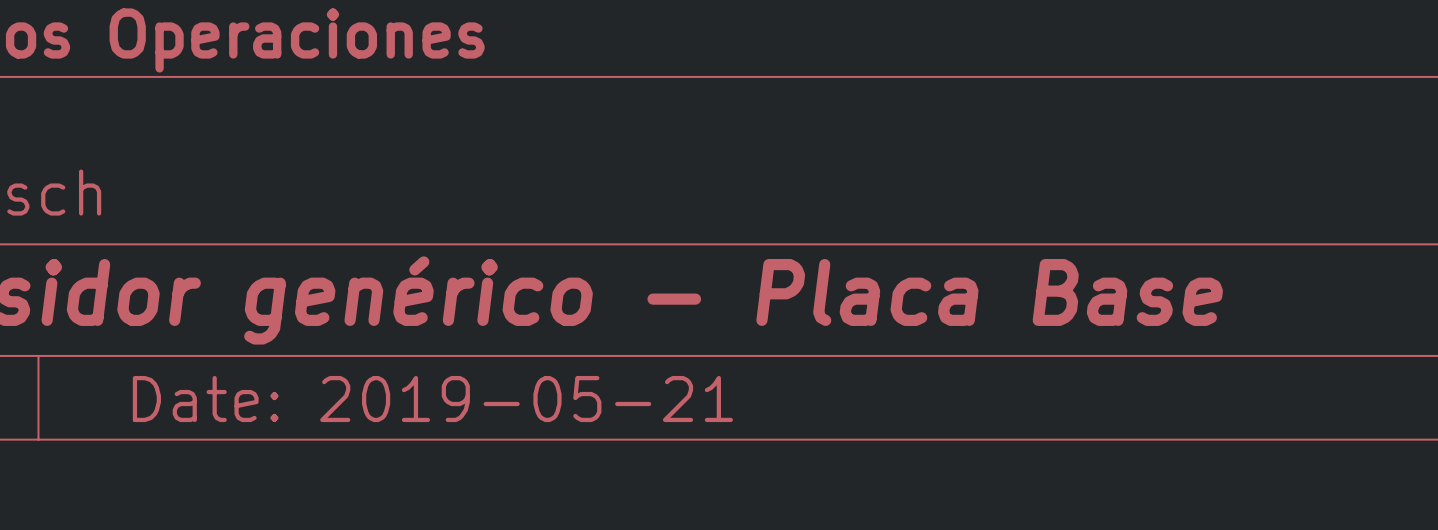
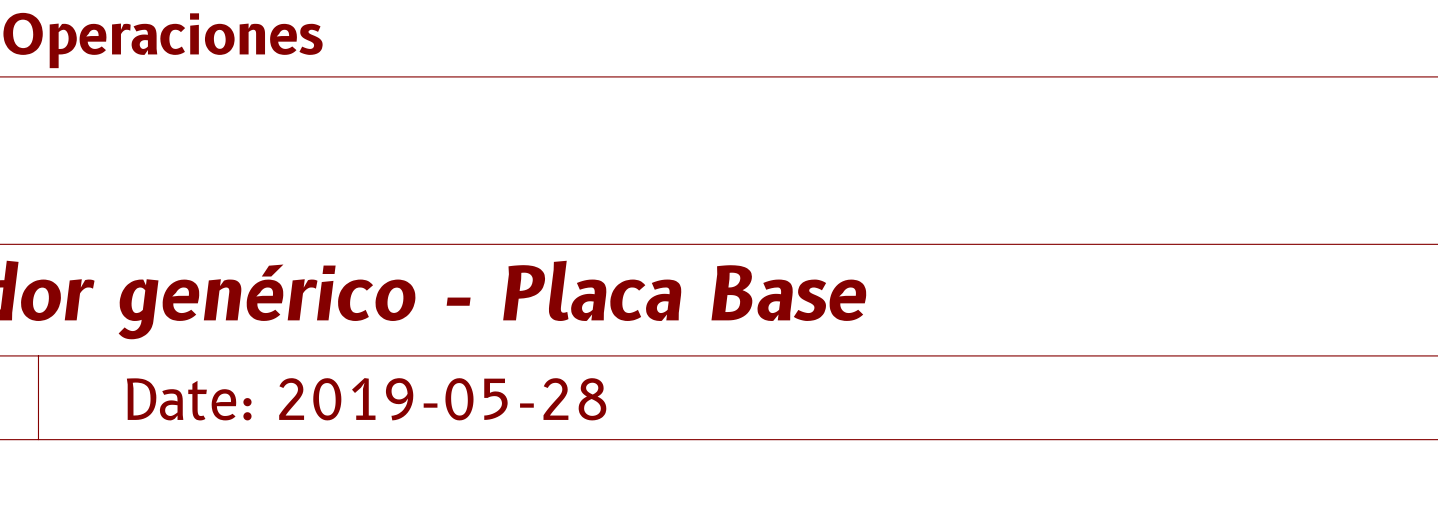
title block: Date: 2019-05-21 (432, 399) -> Date: 2019-05-28 (366, 399)

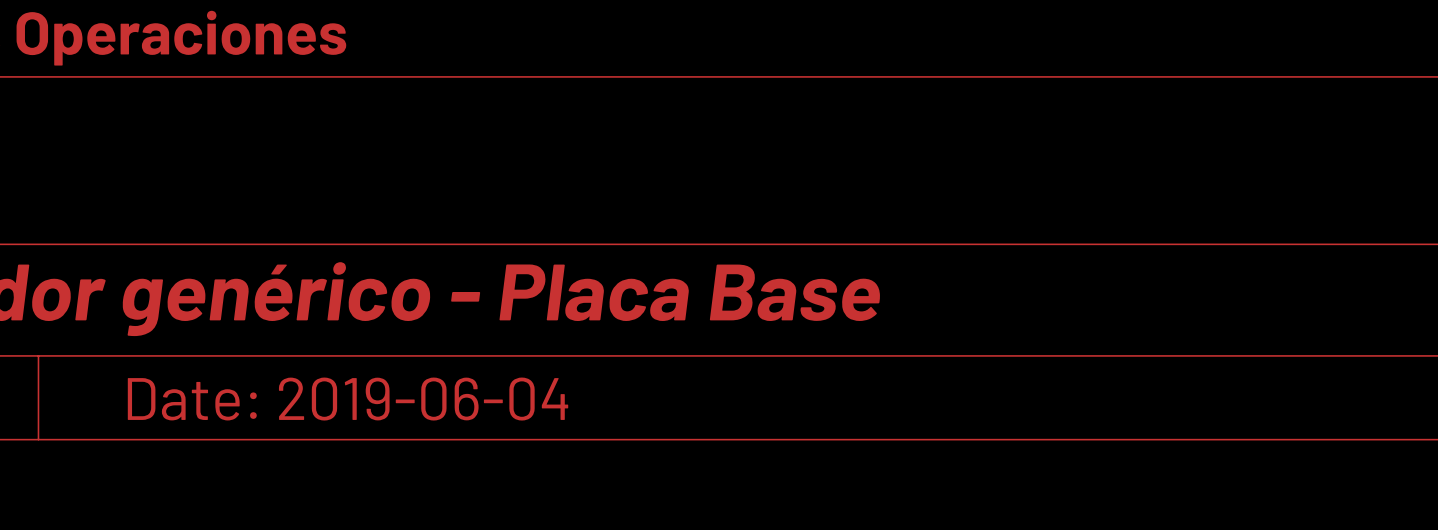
title block: Date: 2019-05-28 (366, 399) -> Date: 2019-06-04 (348, 399)

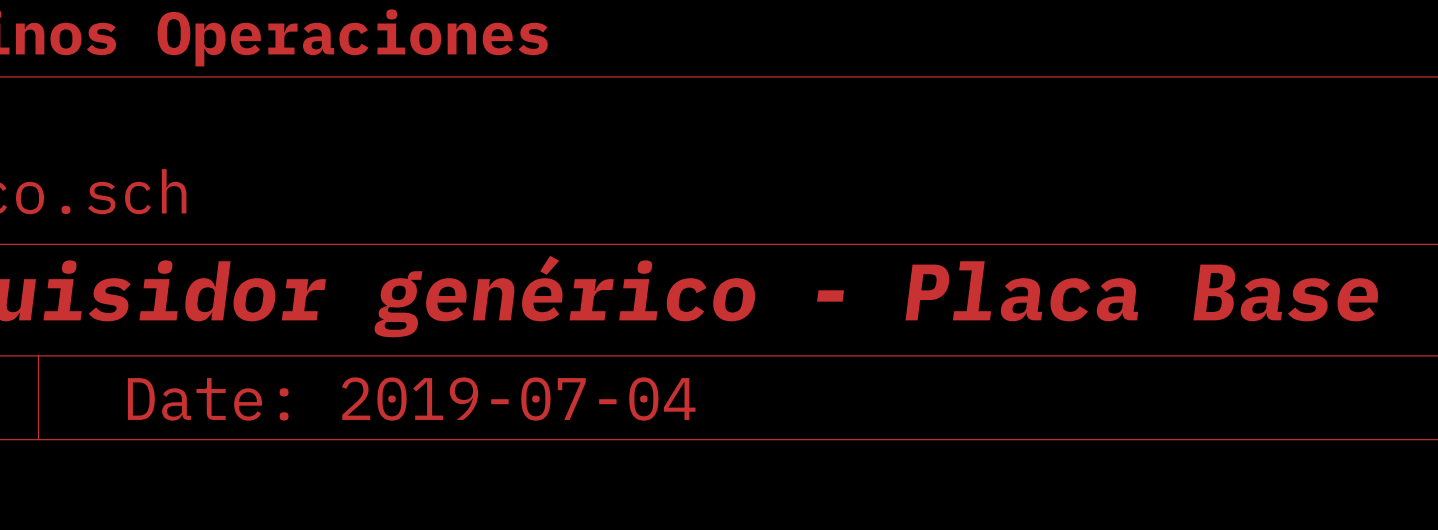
title block: Date: 2019-06-04 (348, 399) -> Date: 2019-07-04 (411, 399)

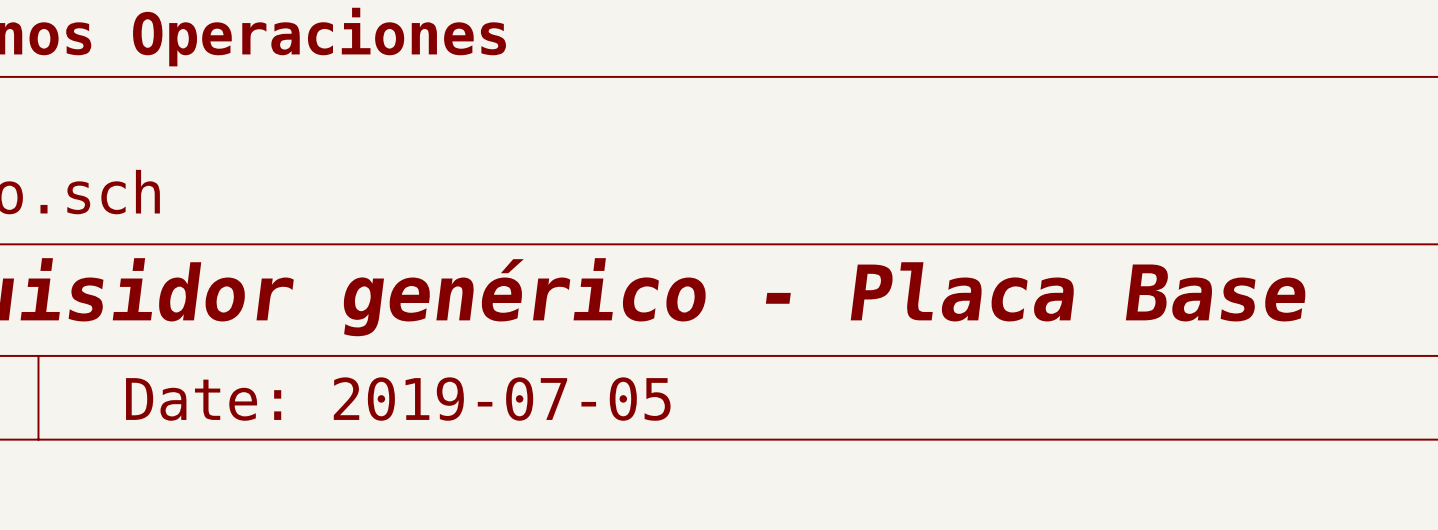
title block: Date: 2019-07-04 (411, 399) -> Date: 2019-07-05 (398, 399)

